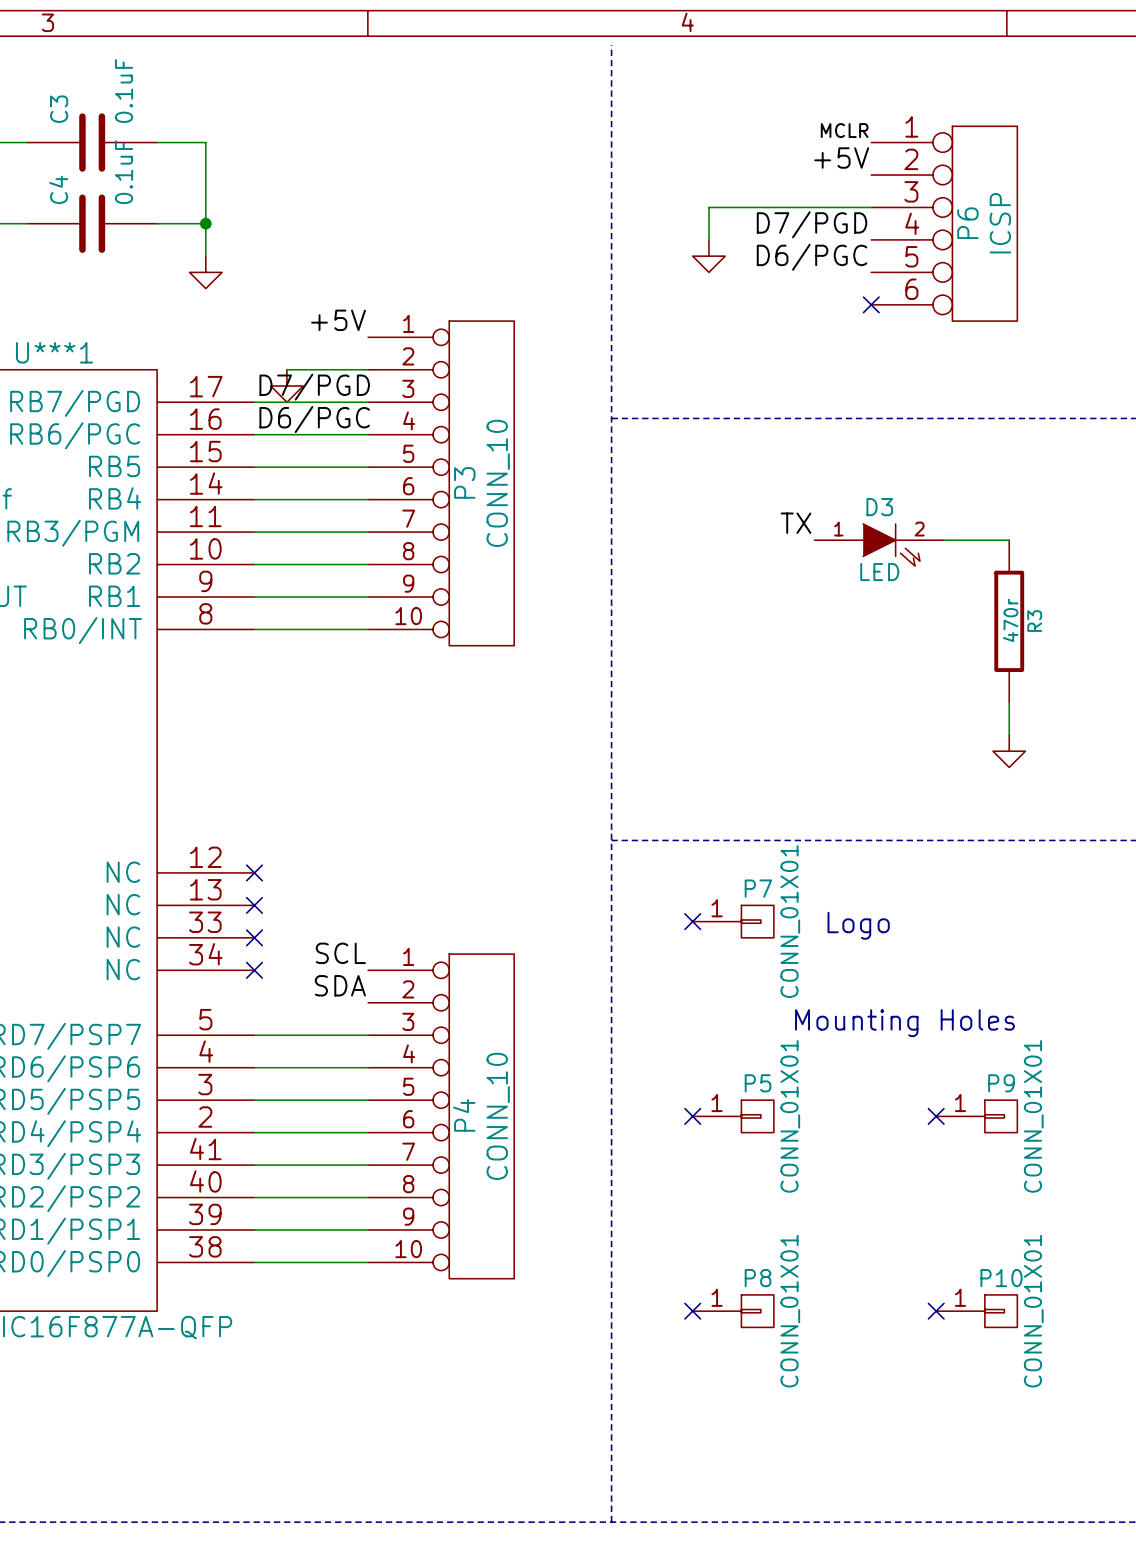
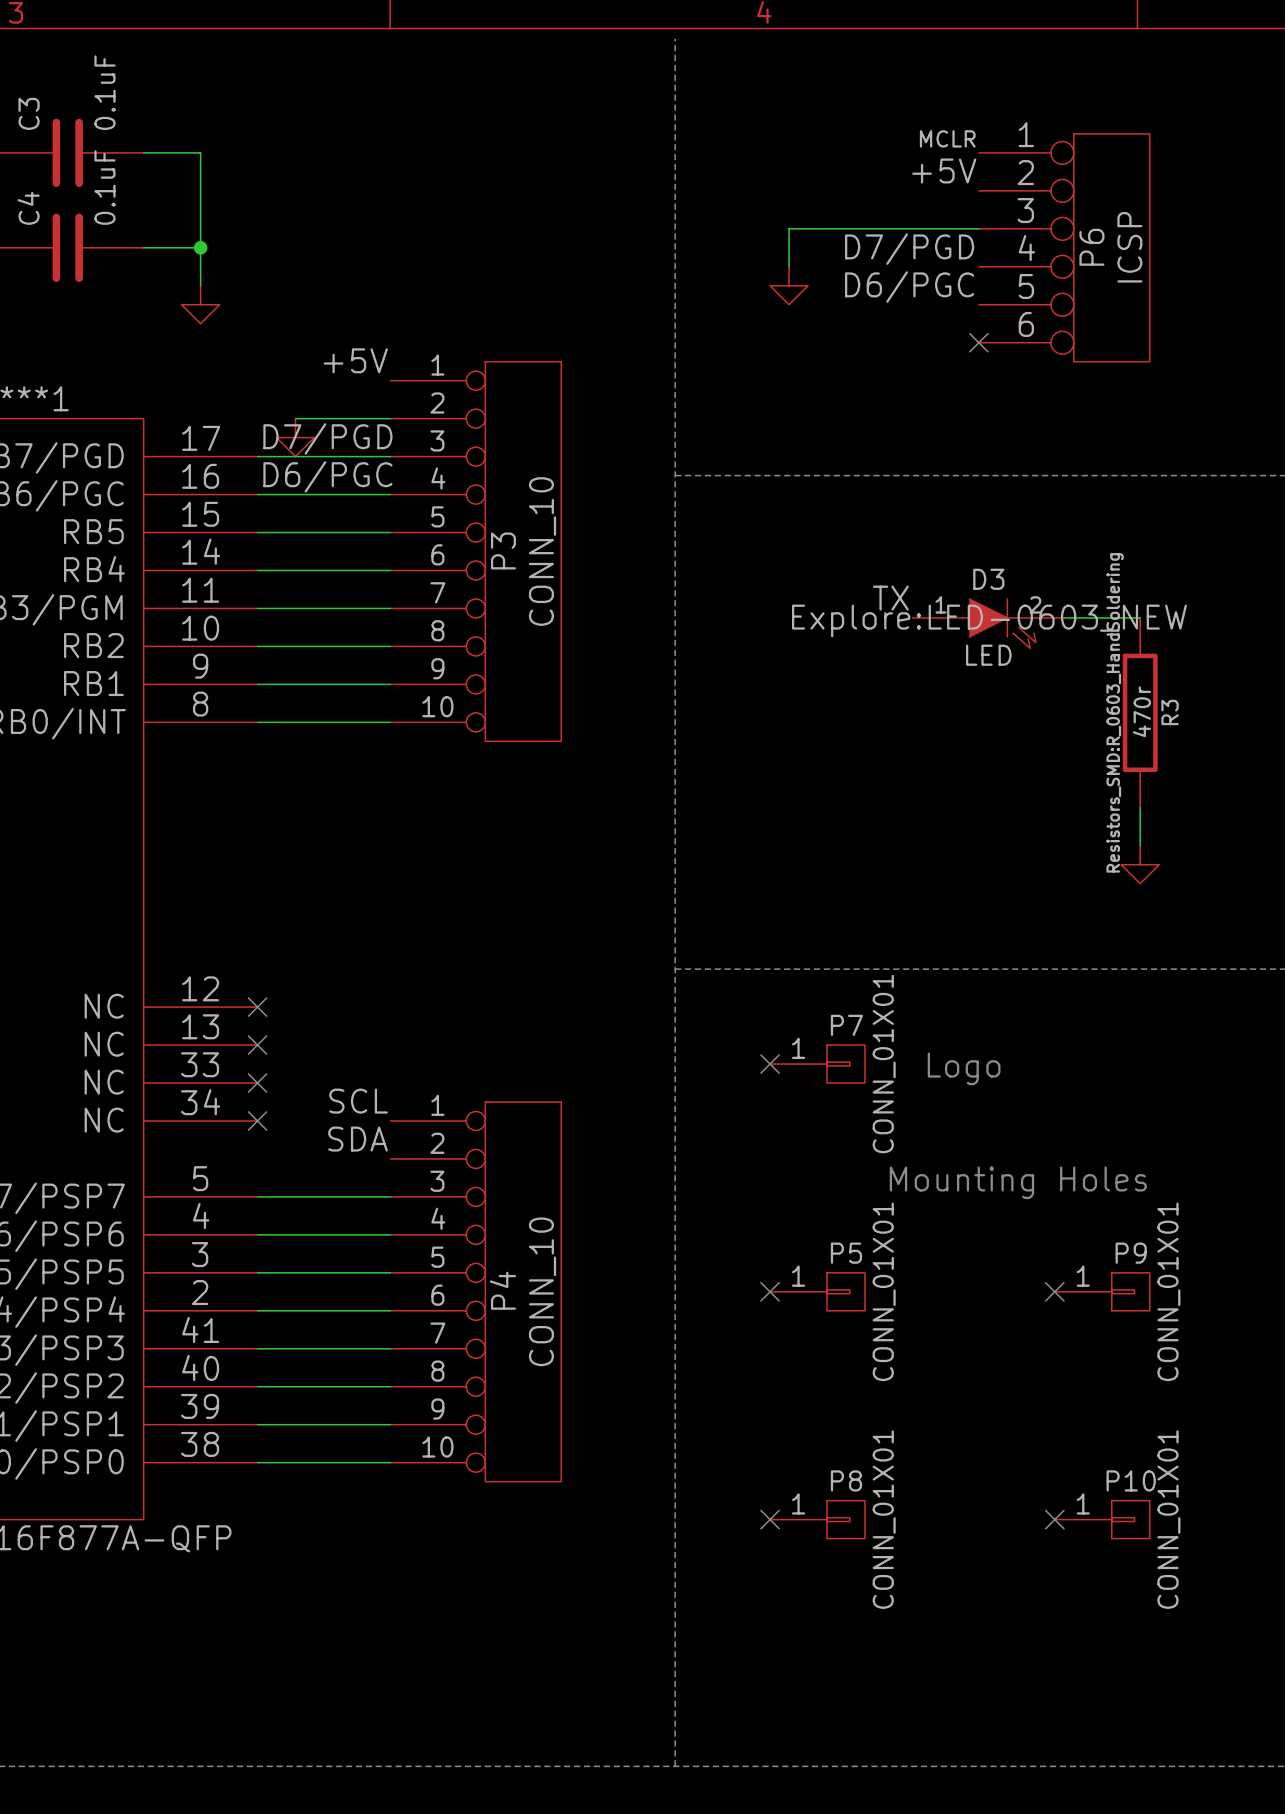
D3 text: none -> Explore:LED-0603_NEW (989, 620)
R3 text: none -> Resistors_SMD:R_0603_HandSoldering (1115, 712)

